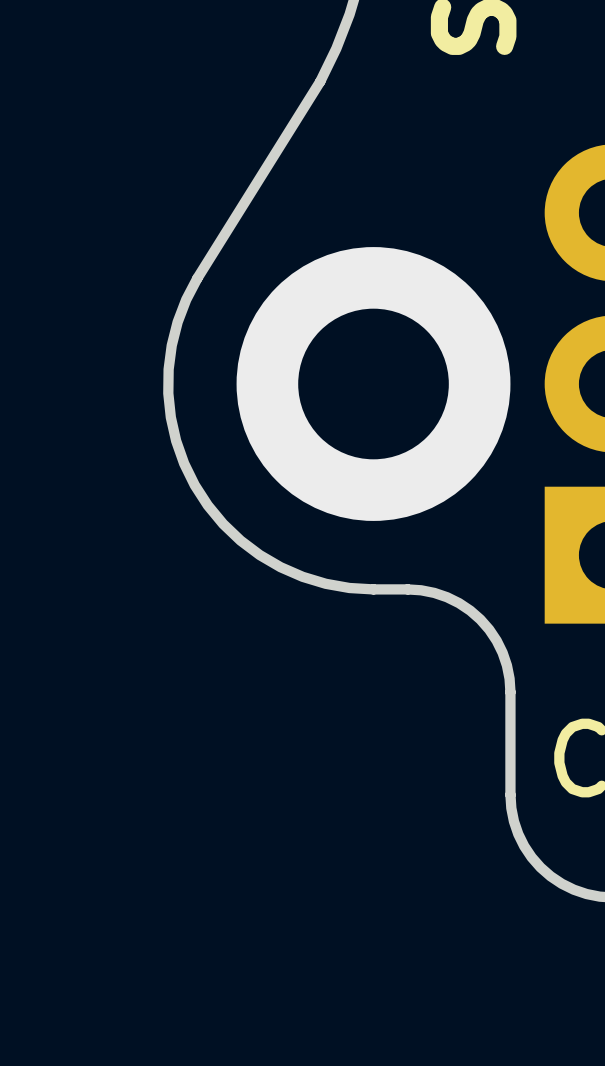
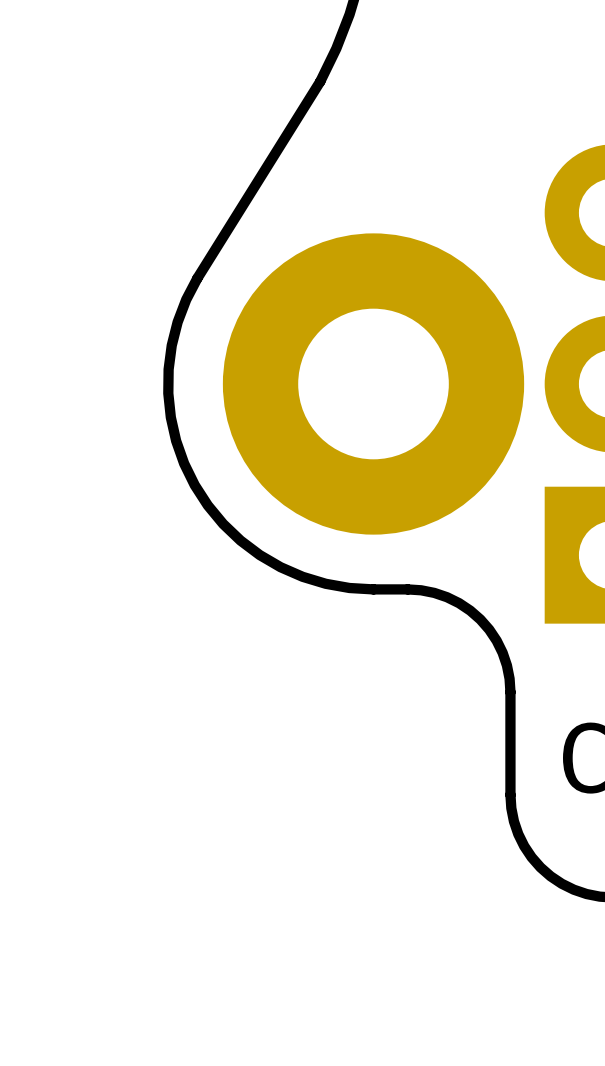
part: none -> (373, 384)
via: (373, 384) -> none

